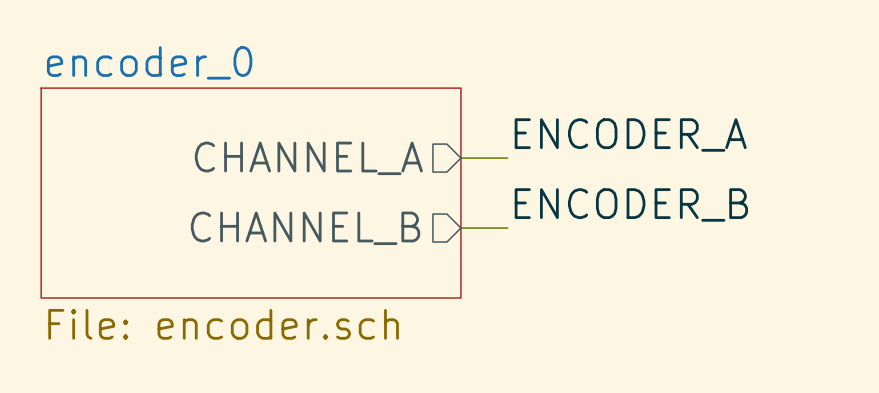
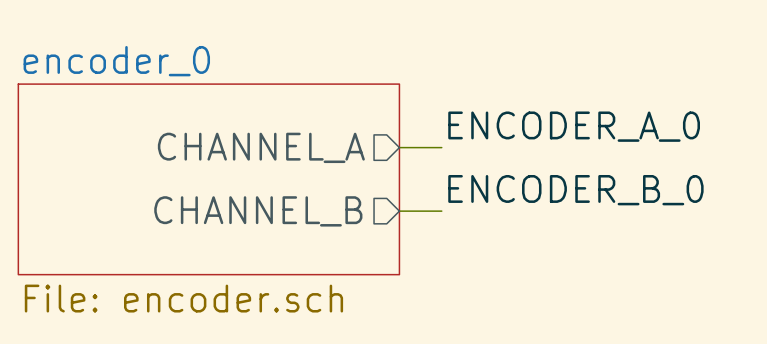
label: ENCODER_A (630, 135) -> ENCODER_A_0 (574, 126)
label: ENCODER_B (631, 204) -> ENCODER_B_0 (575, 190)

